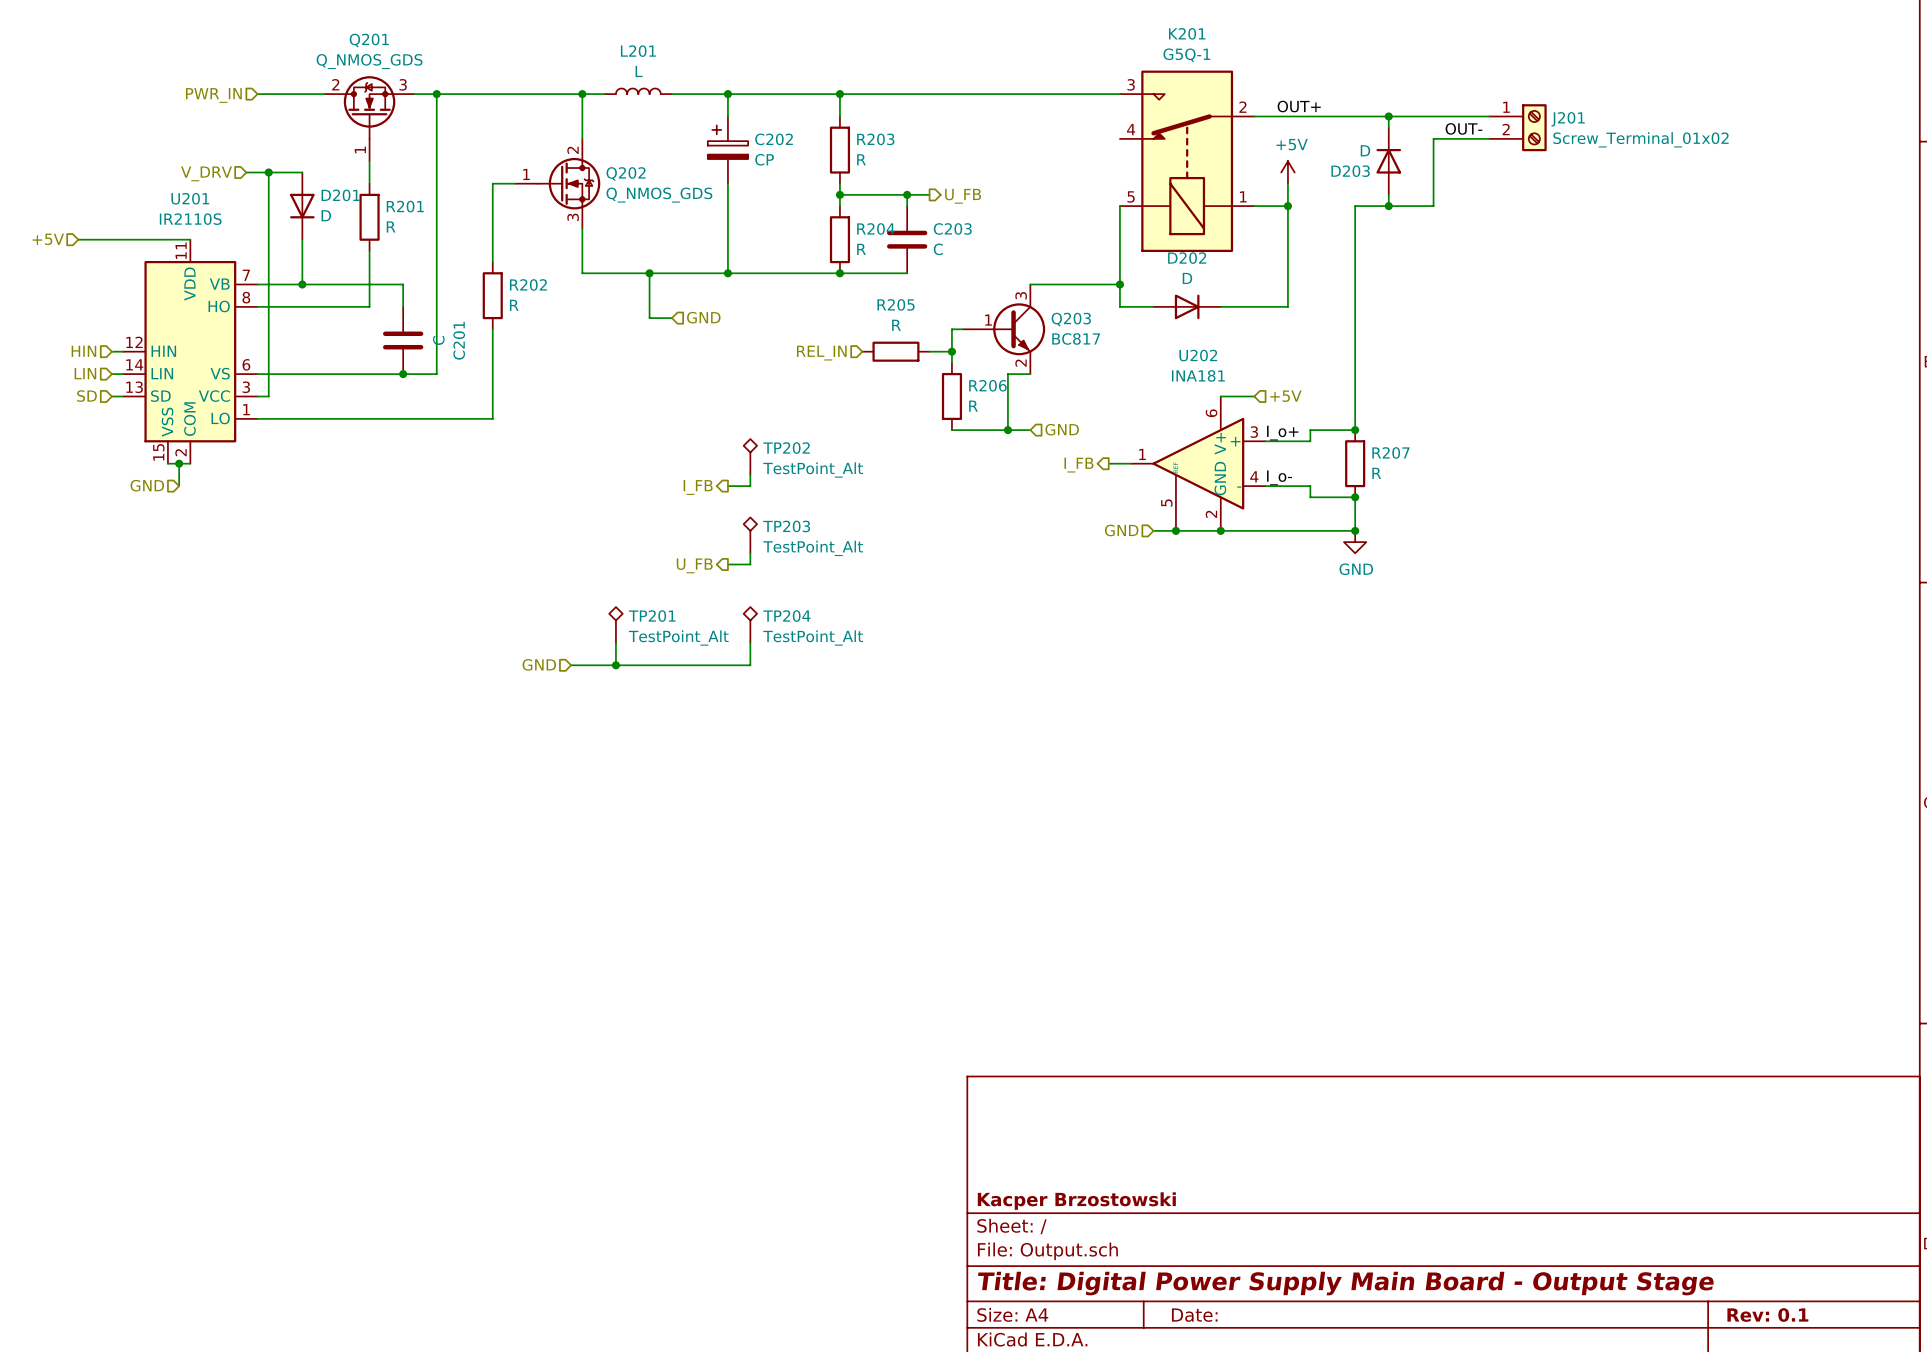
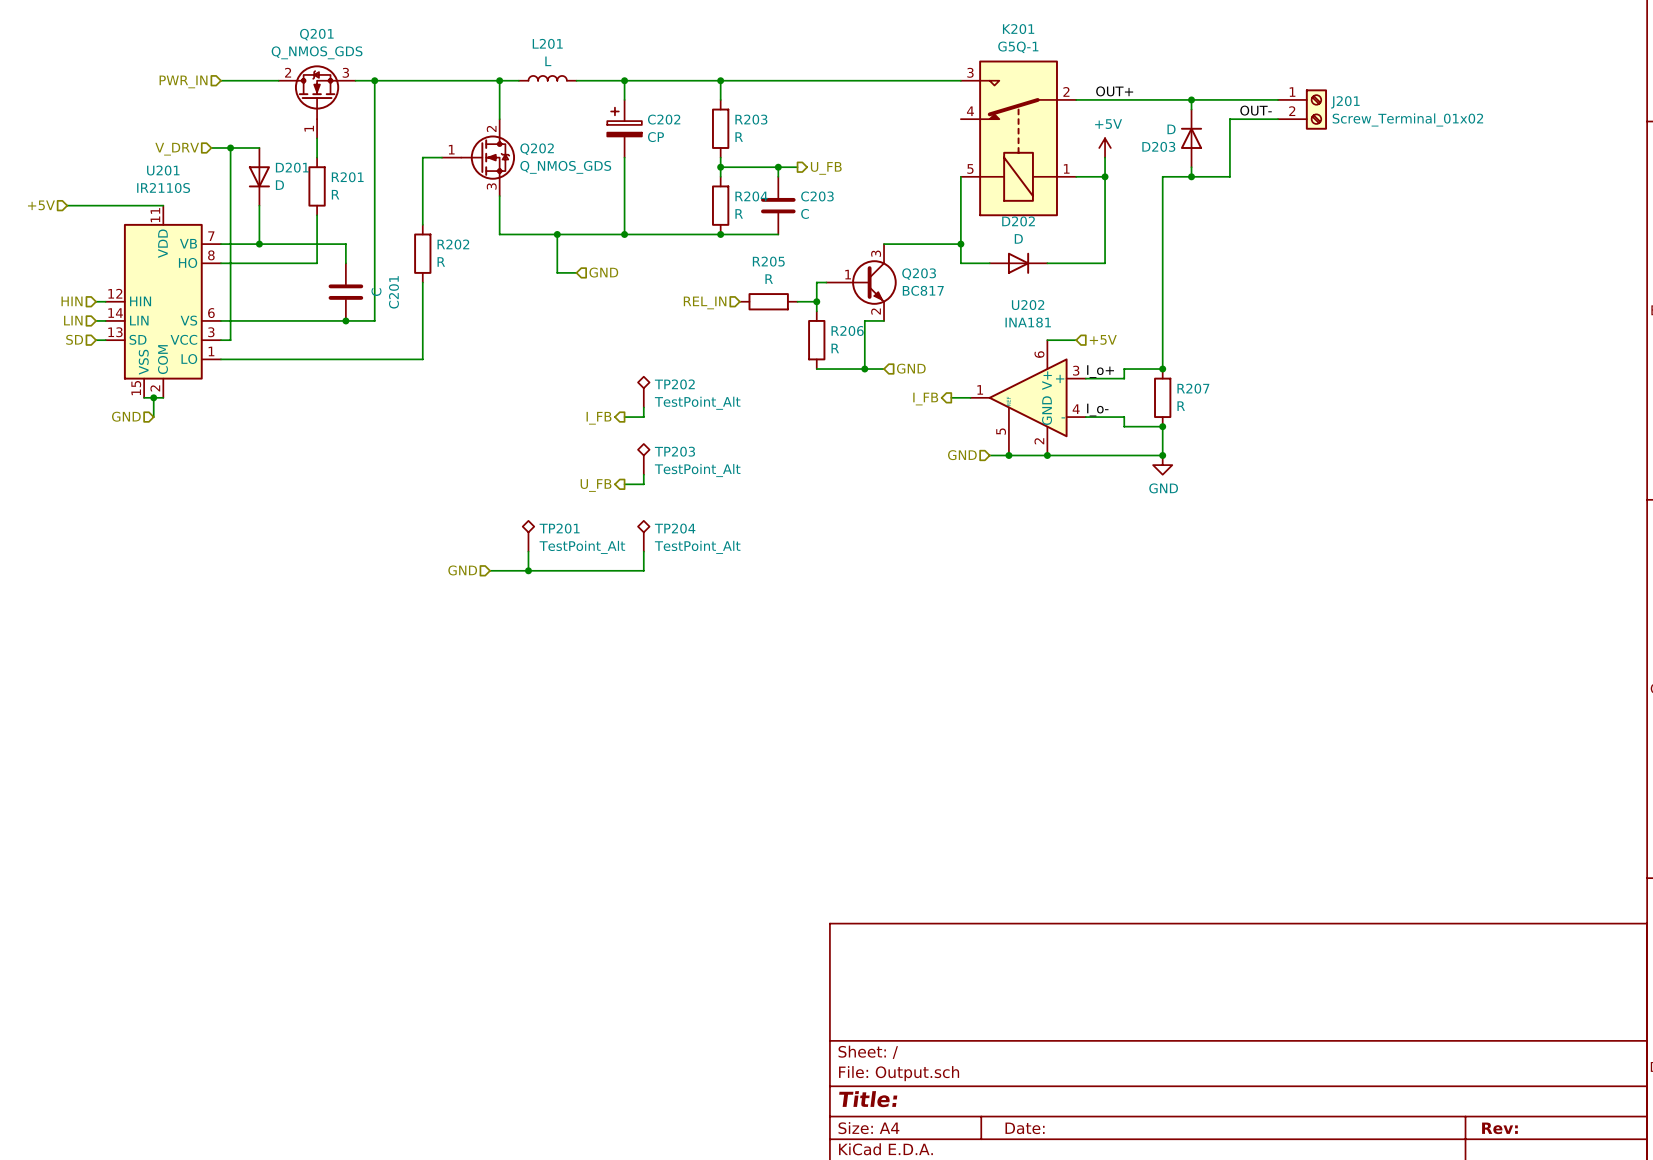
title block: Kacper Brzostowski (1076, 1201) -> none
title block: Title: Digital Power Supply Main Board - Output Stage (1345, 1283) -> Title: (868, 1099)
title block: Rev: 0.1 (1767, 1315) -> Rev: (1499, 1128)

